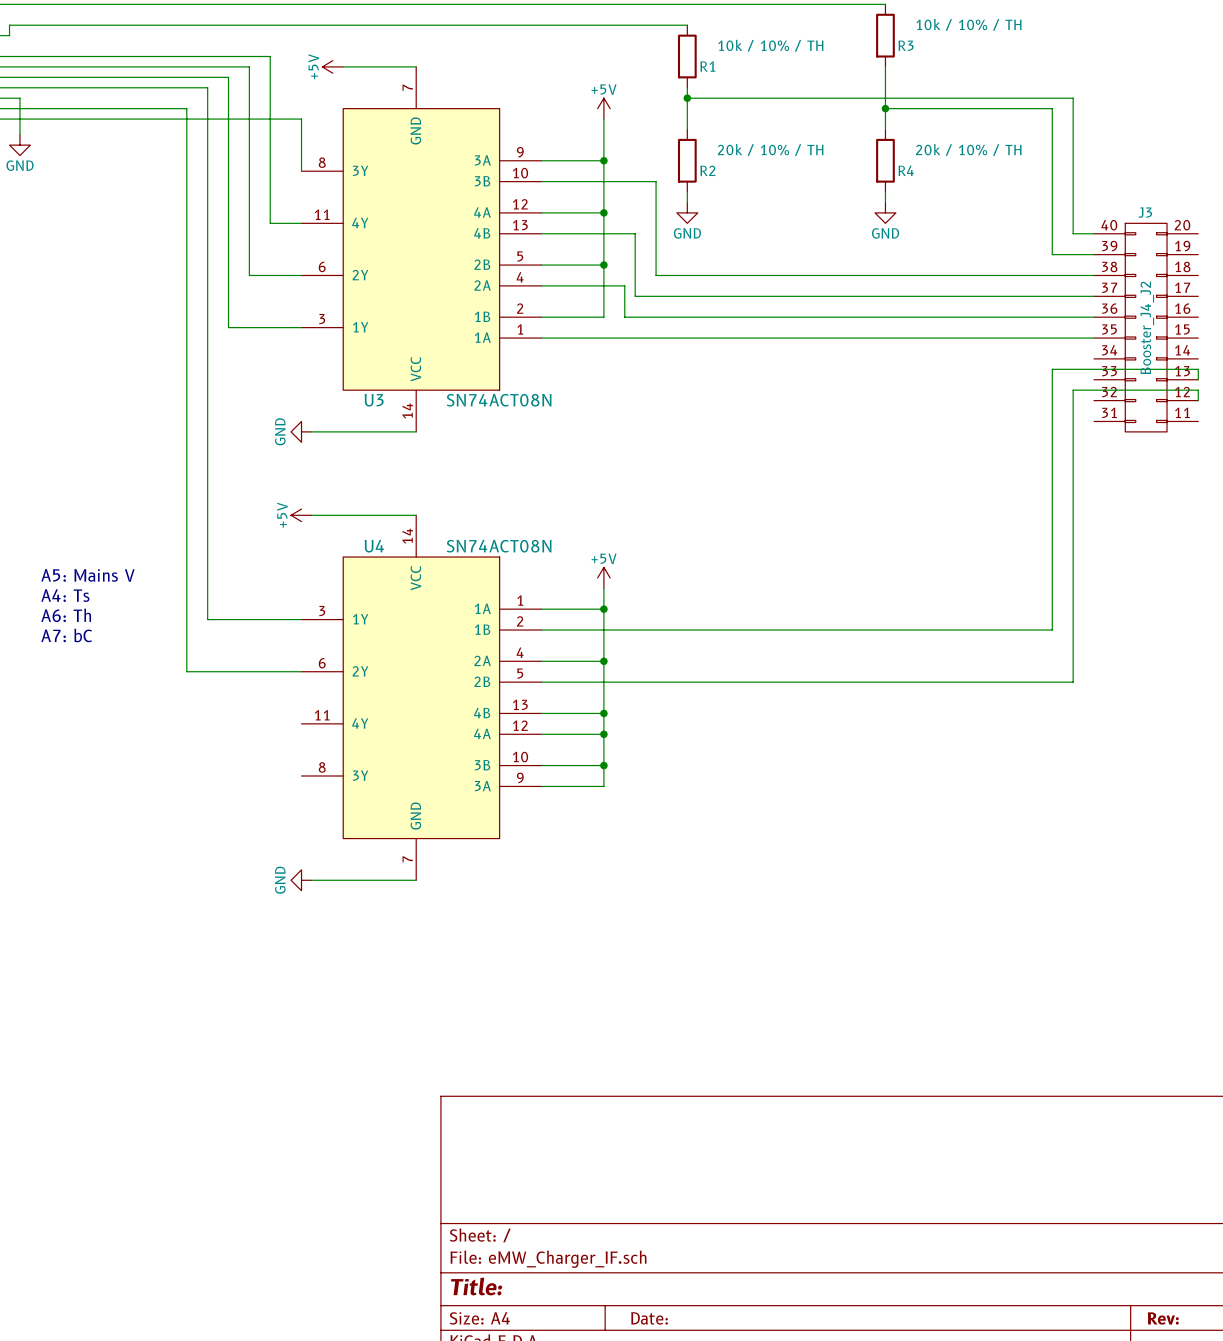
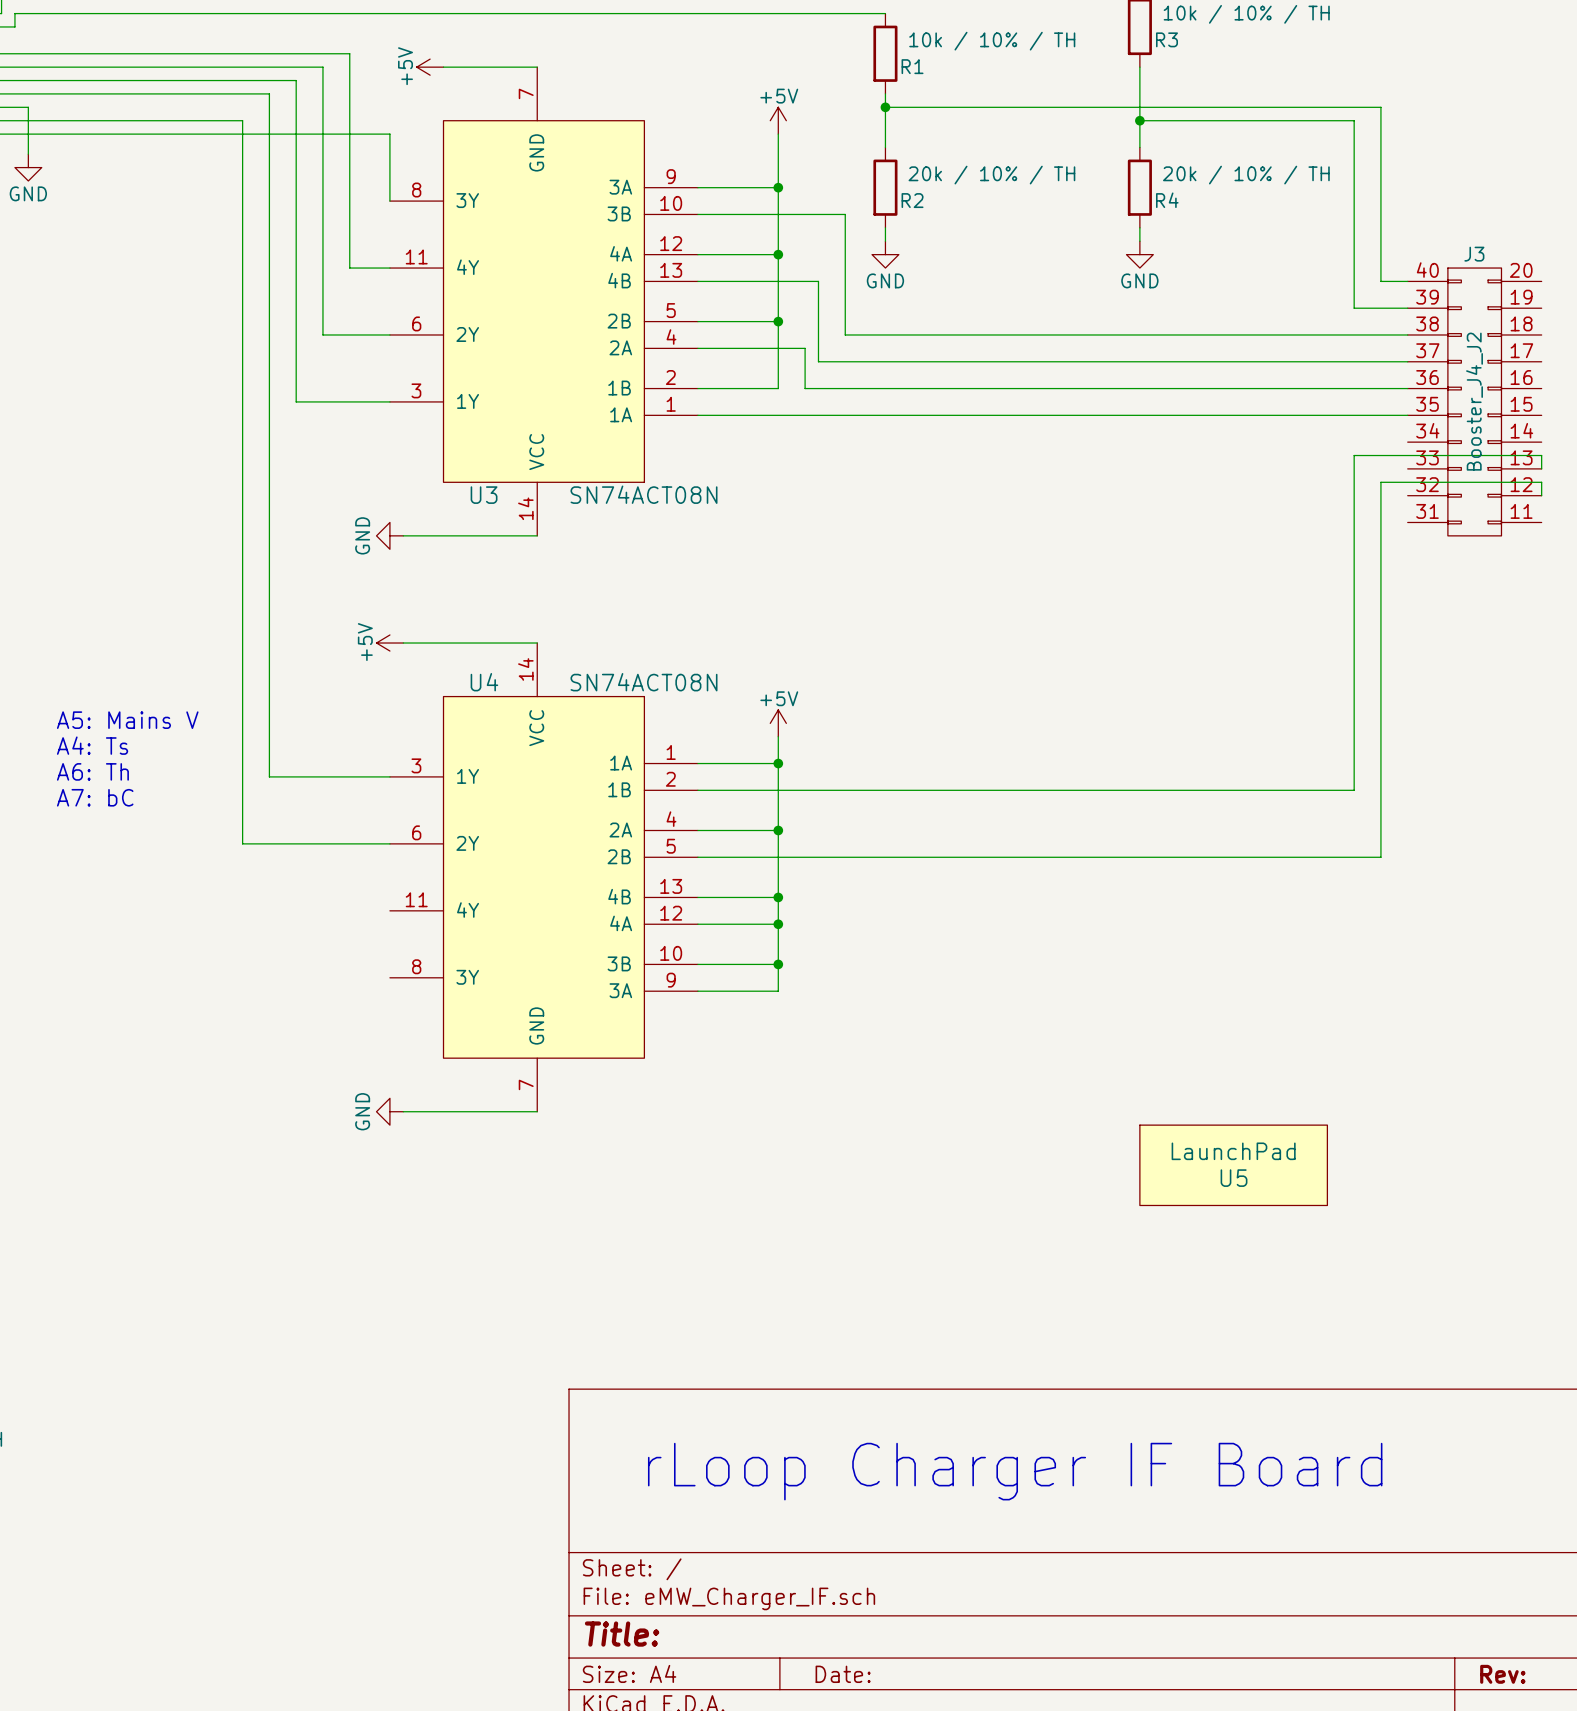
U5: none -> LaunchPad (1233, 1165)
text: none -> rLoop Charger IF Board (1015, 1471)

